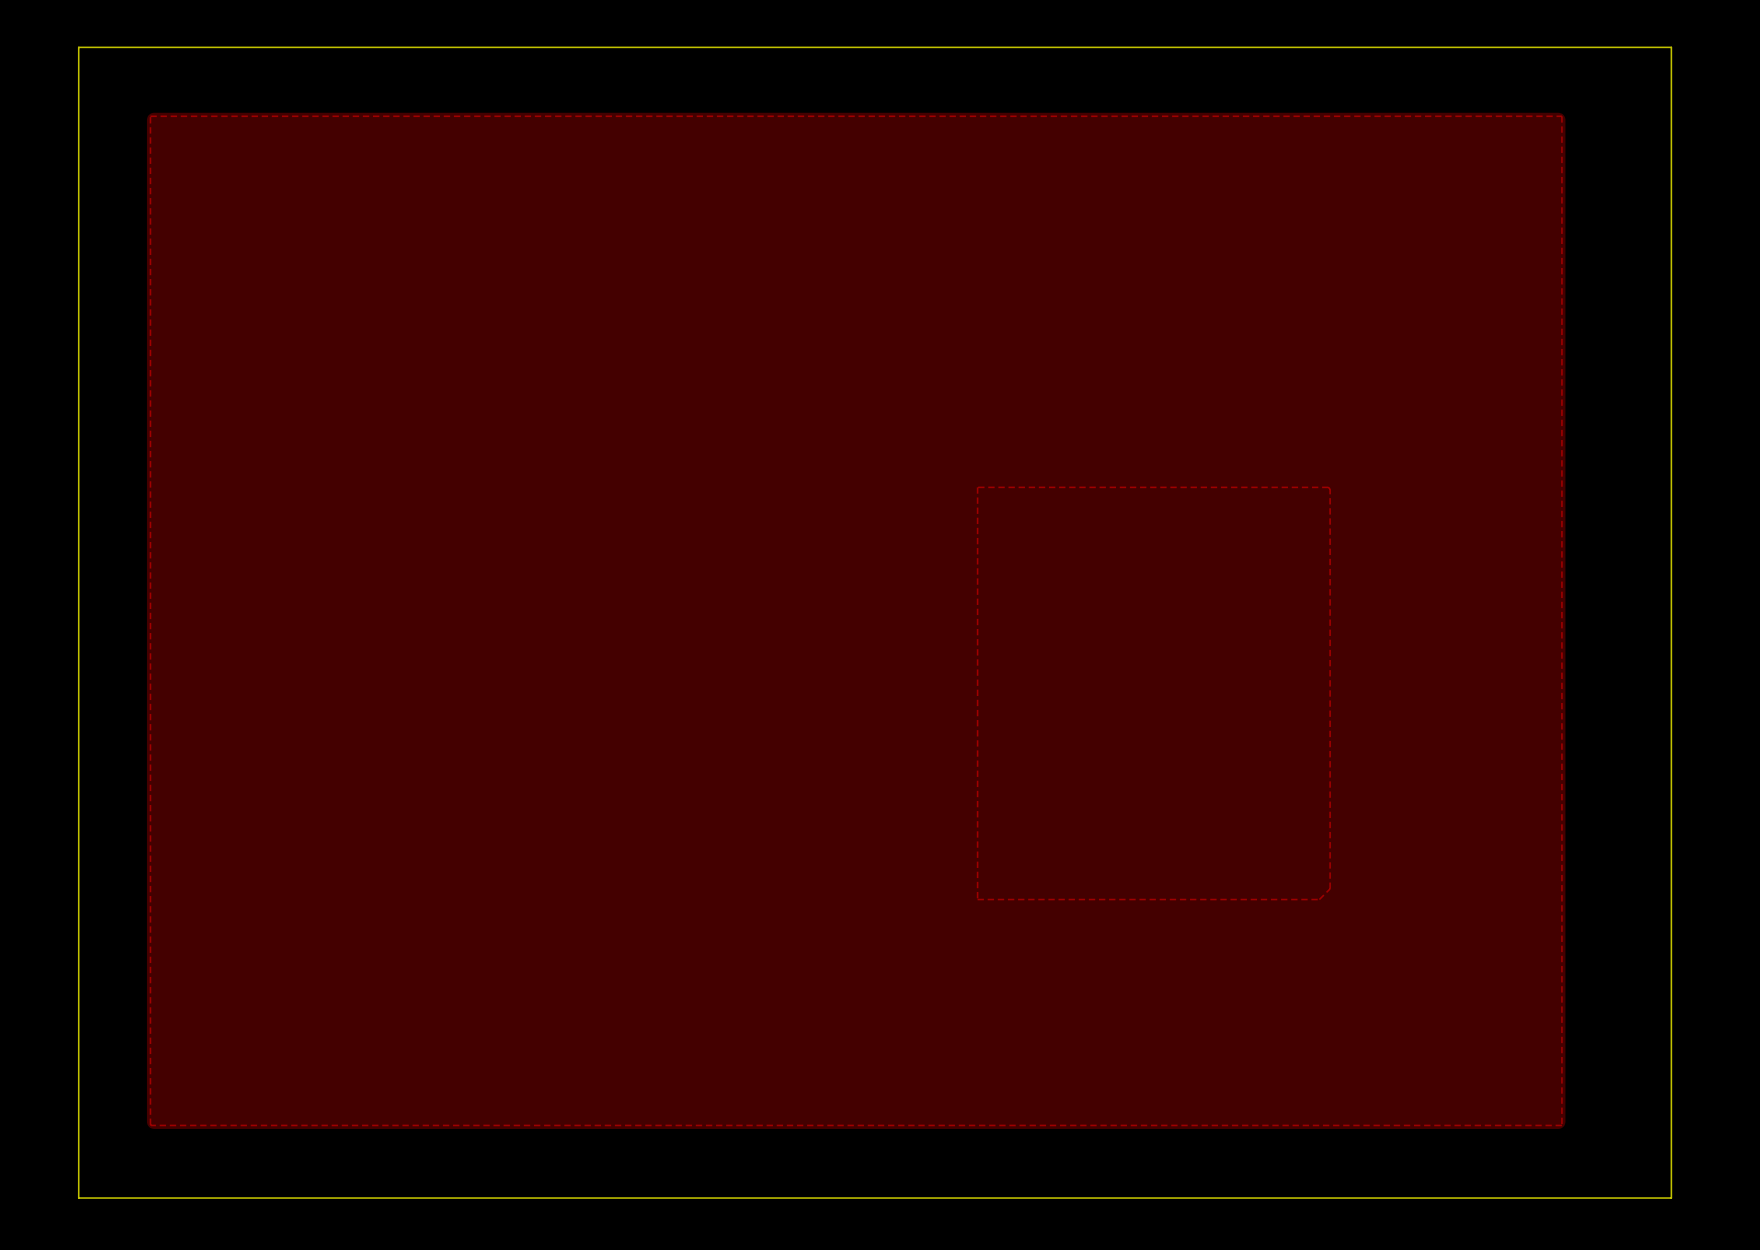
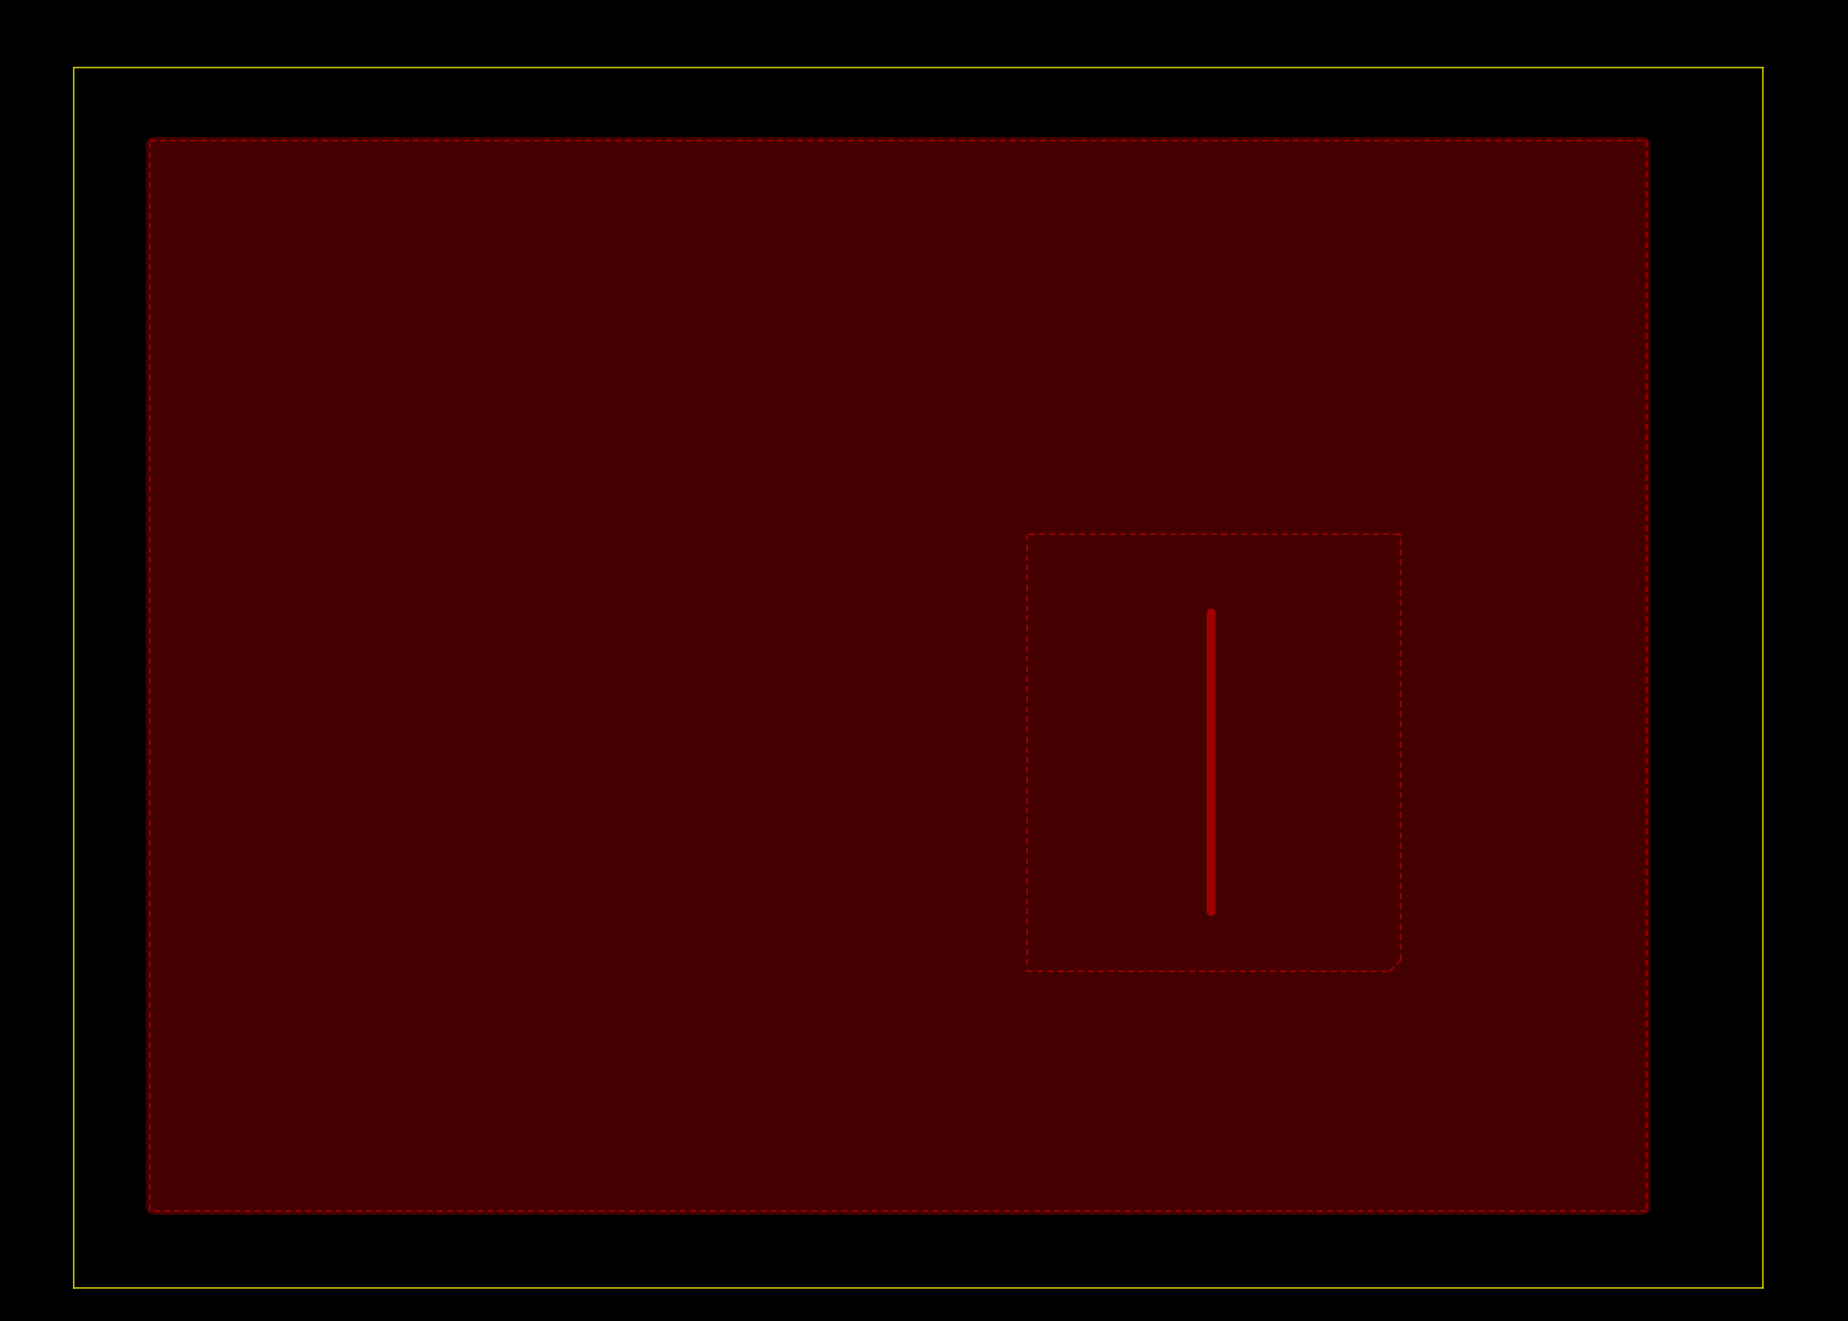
top track: none -> (1211, 613) (1211, 911)

